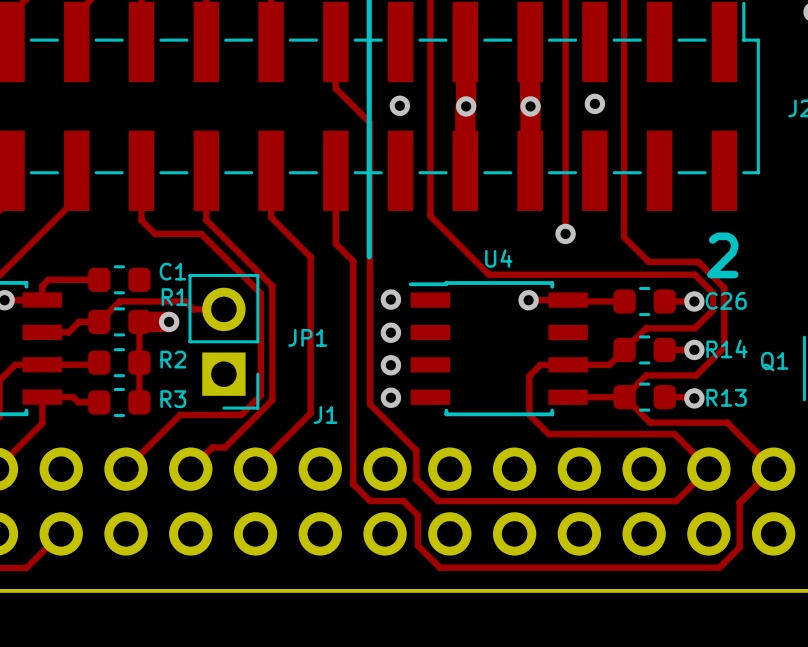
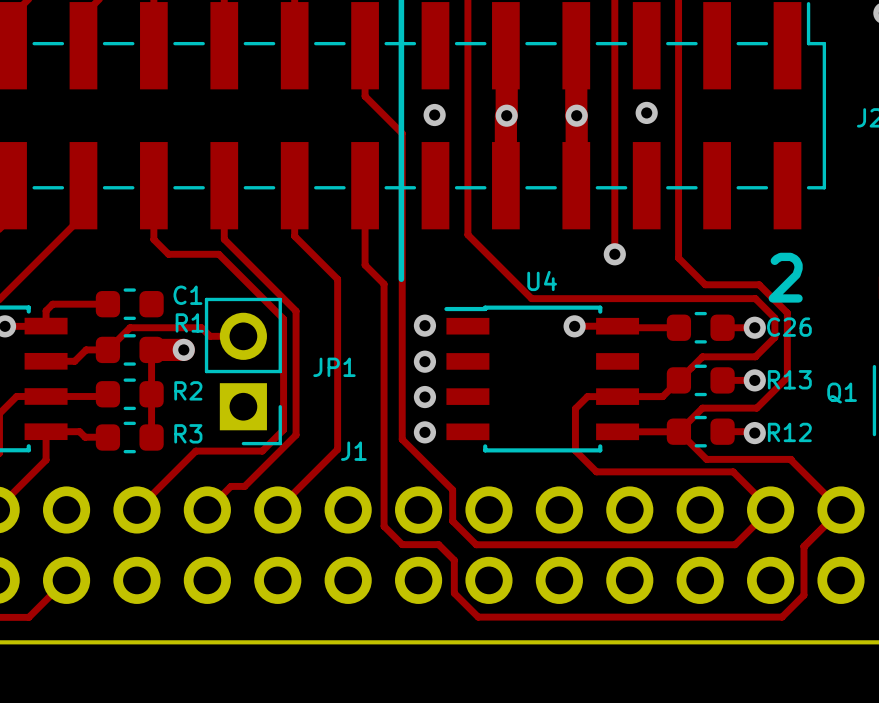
R14 name: R14 (726, 349) -> R13 (789, 379)
R13 name: R13 (726, 397) -> R12 (789, 432)

